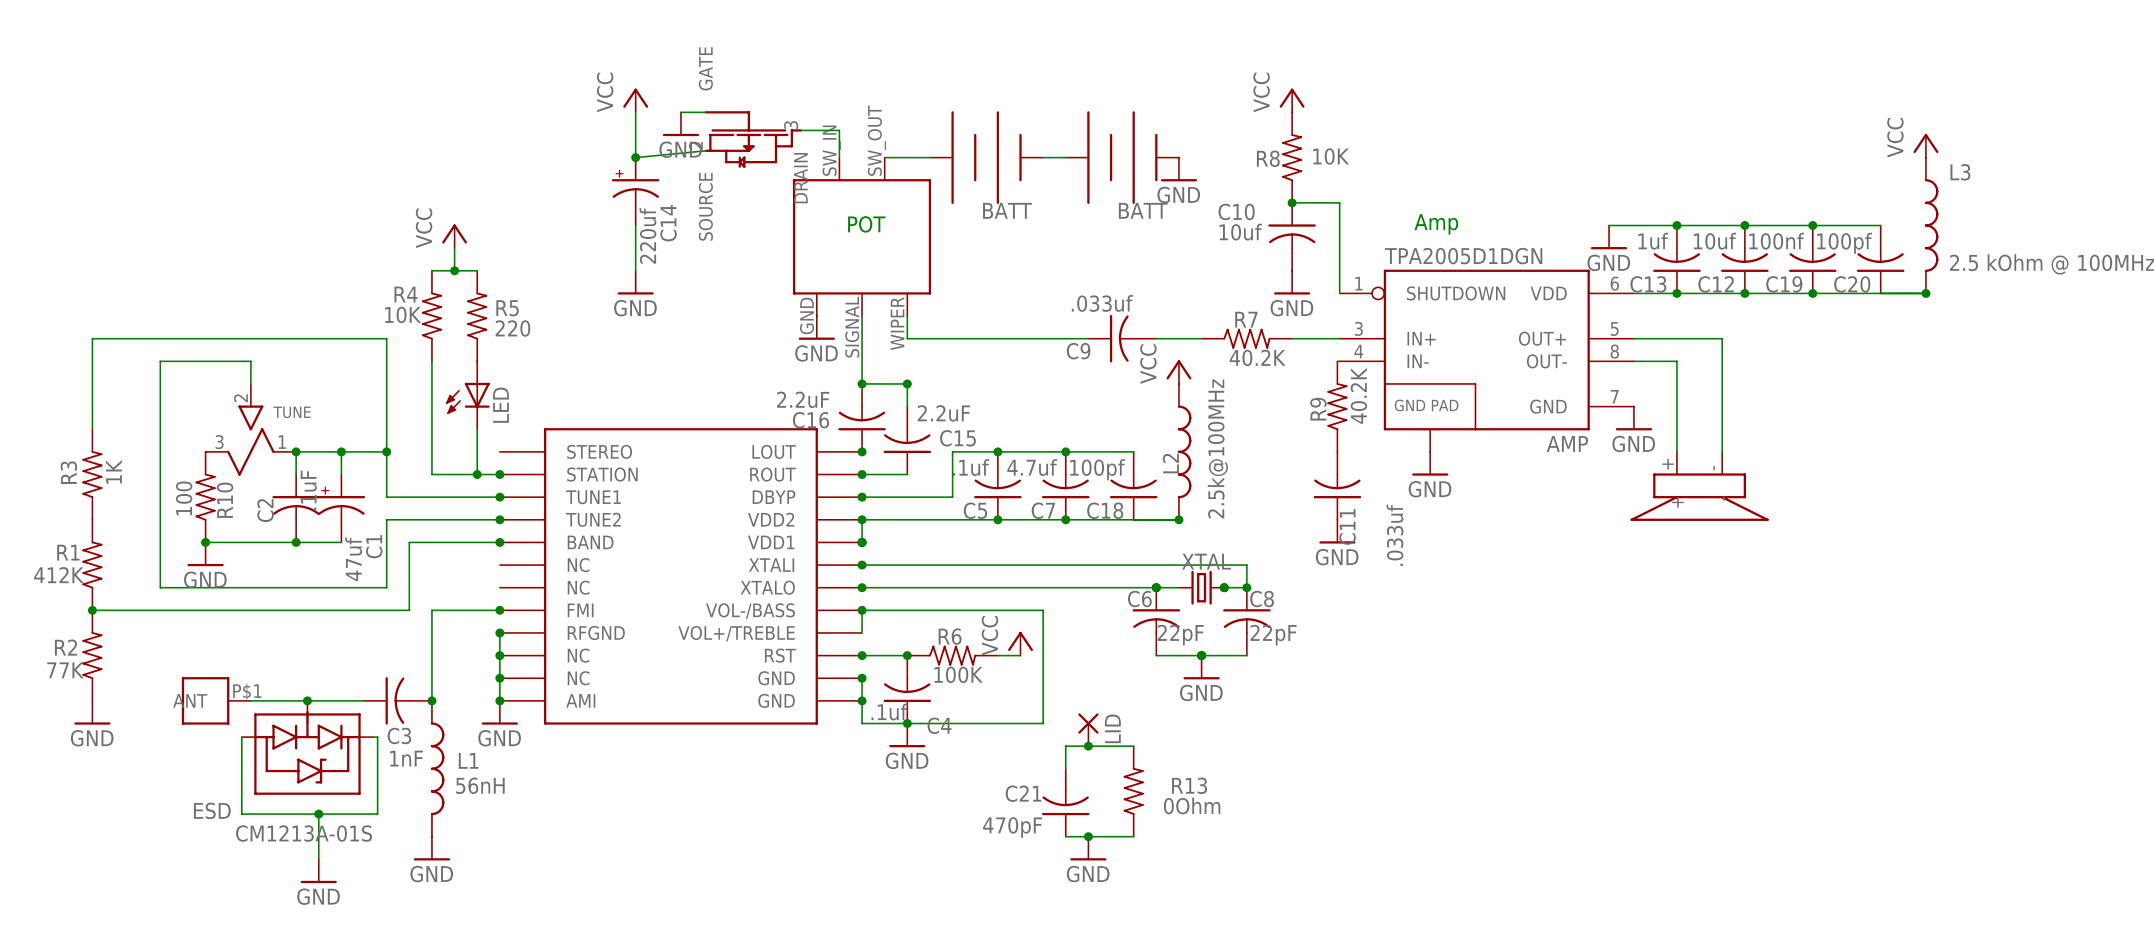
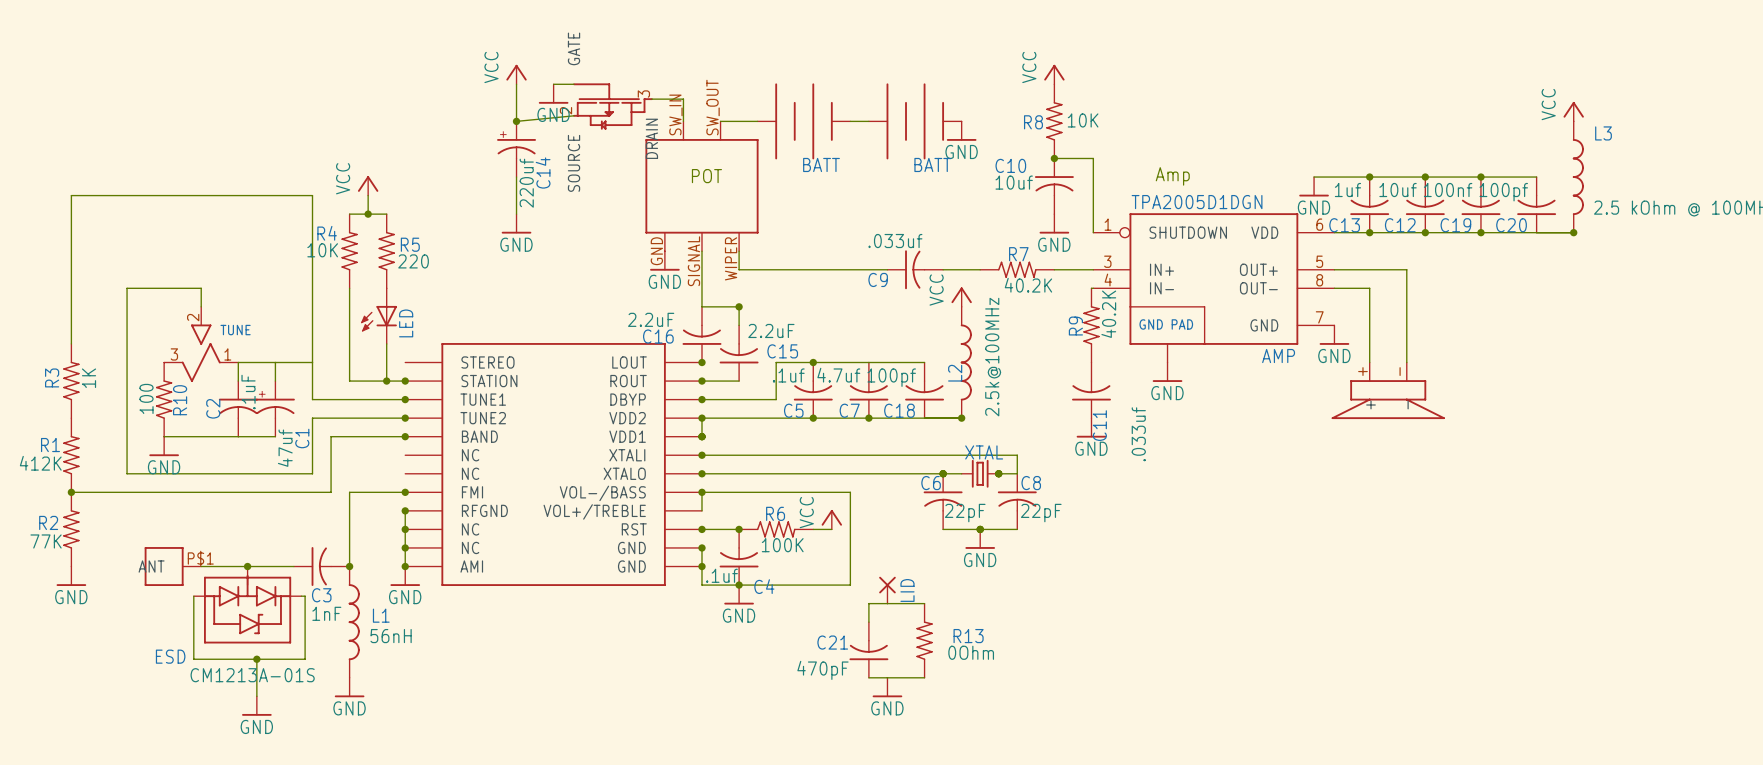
wire: (92, 338) (386, 338) -> (71, 269) (71, 195) (312, 195) (312, 269)
junction: (862, 383) -> none
junction: (296, 451) -> none
junction: (341, 451) -> none
junction: (386, 451) -> none
junction: (1065, 451) -> none
junction: (205, 542) -> none
junction: (296, 542) -> none
junction: (1246, 587) -> none
junction: (1088, 746) -> none
junction: (1088, 836) -> none

